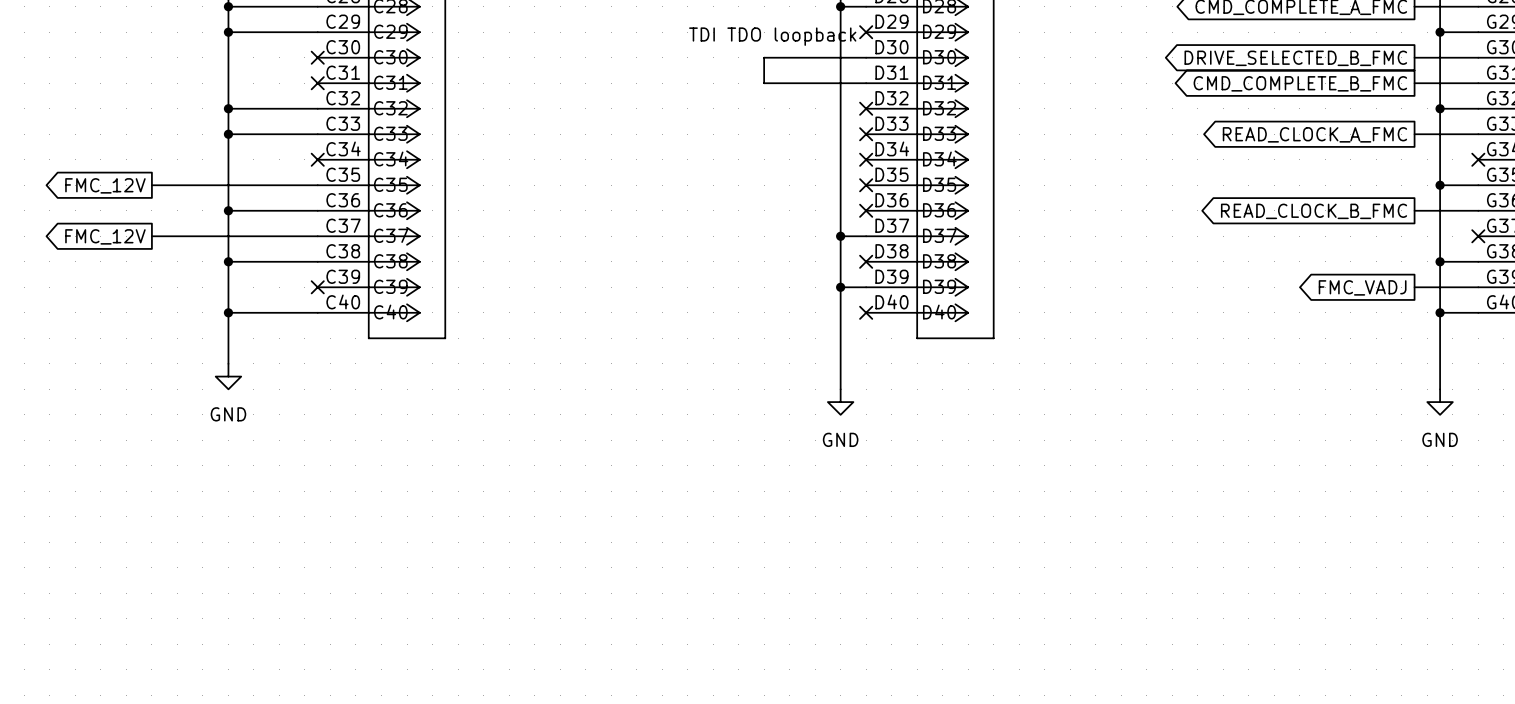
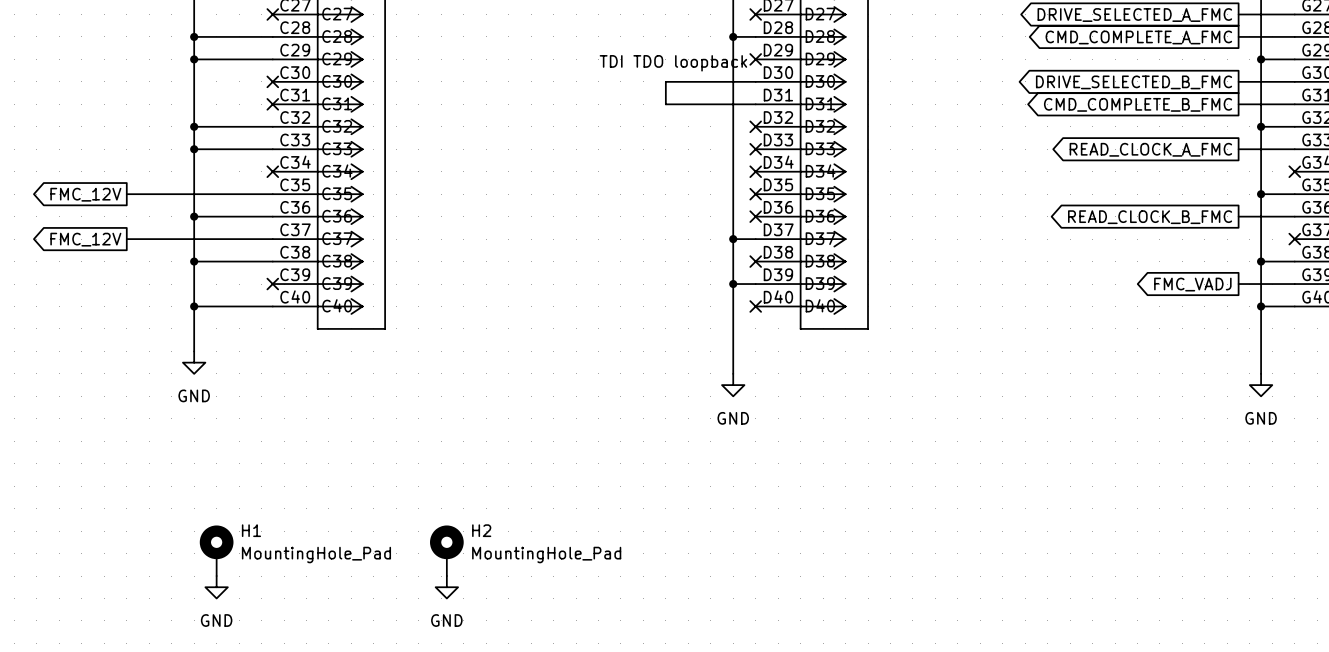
H1: none -> MountingHole_Pad (216, 550)
H2: none -> MountingHole_Pad (446, 550)
power symbol: none -> GND (216, 587)
power symbol: none -> GND (446, 587)

